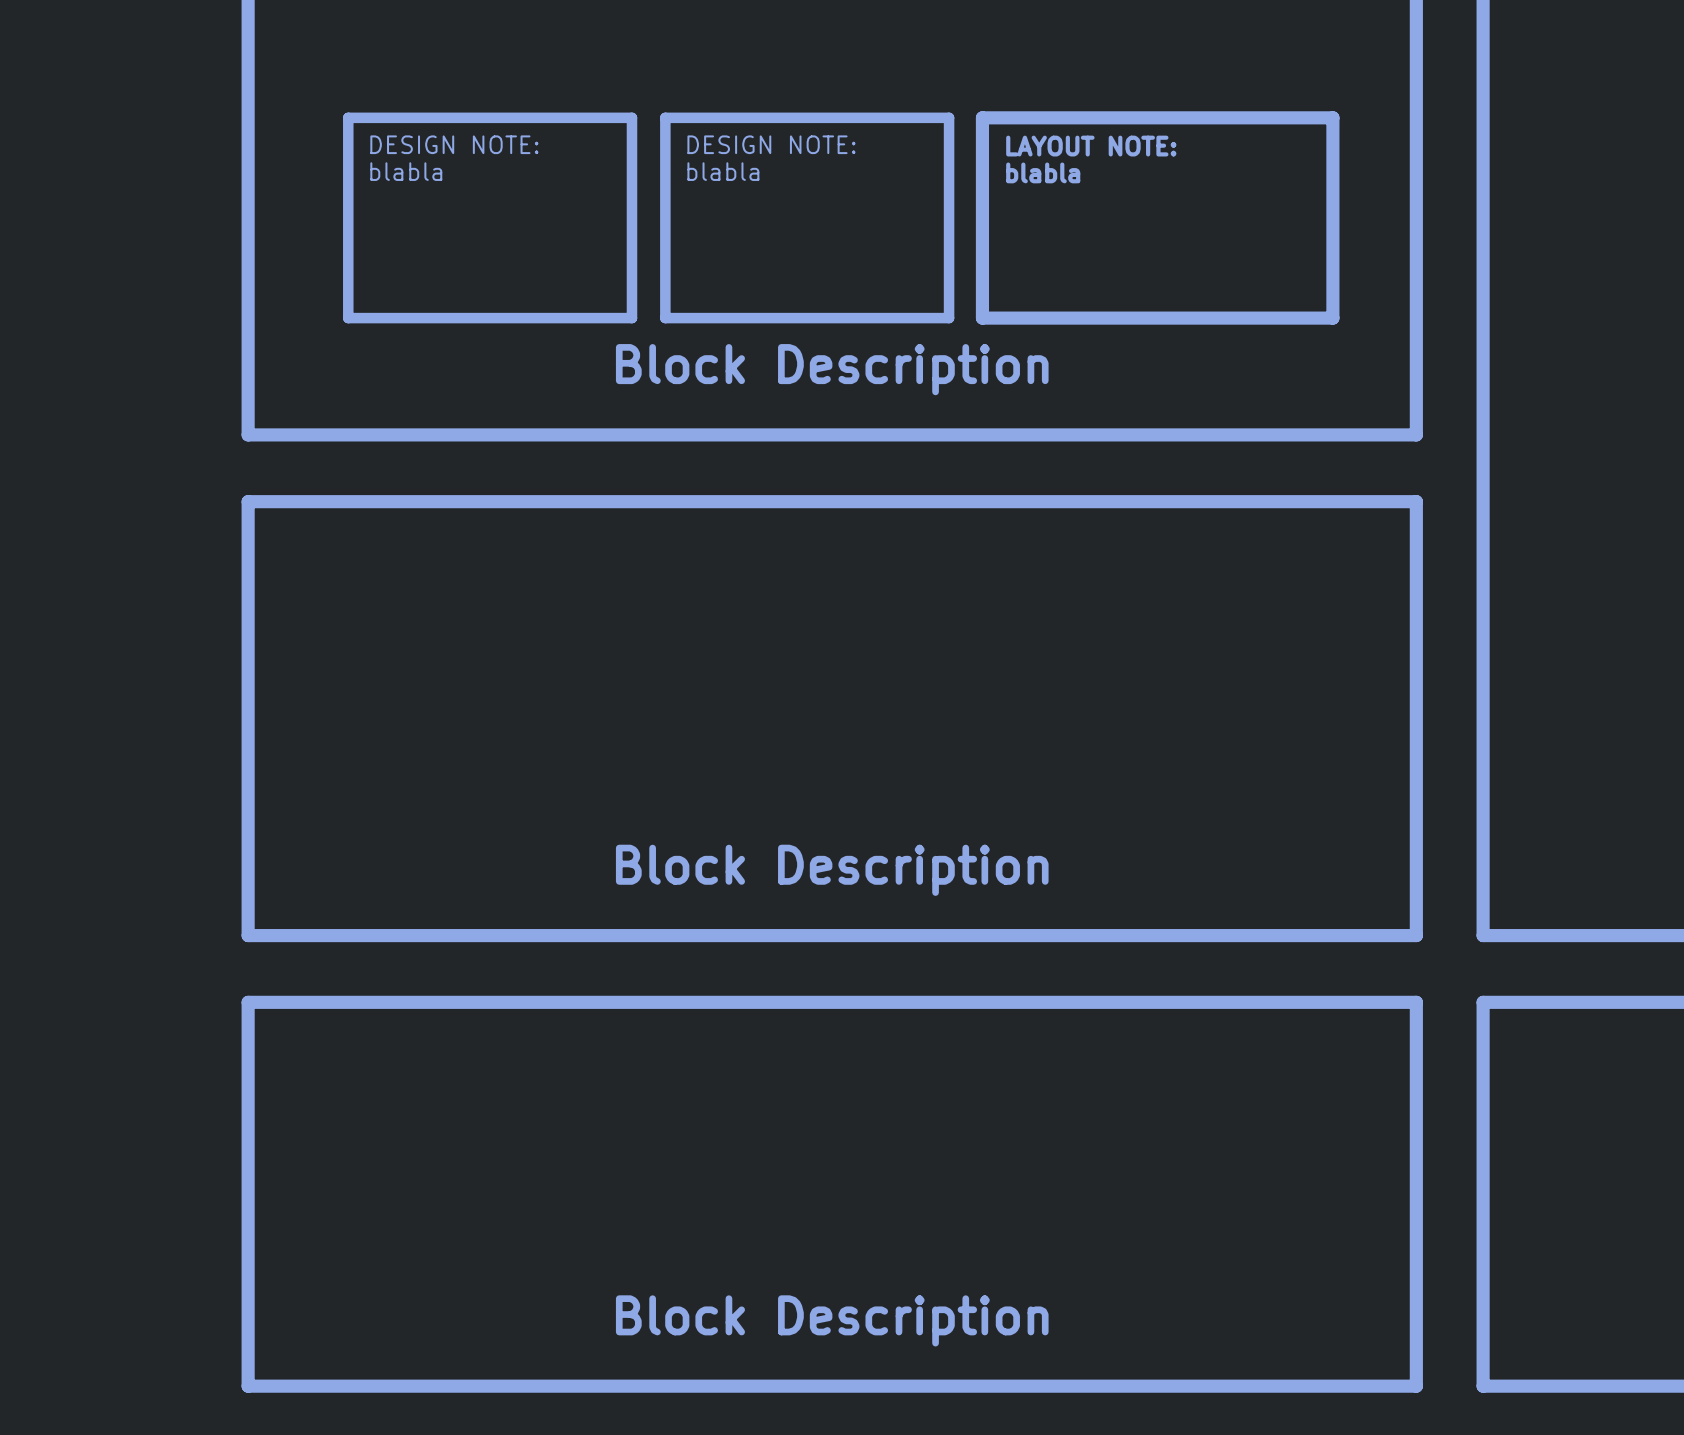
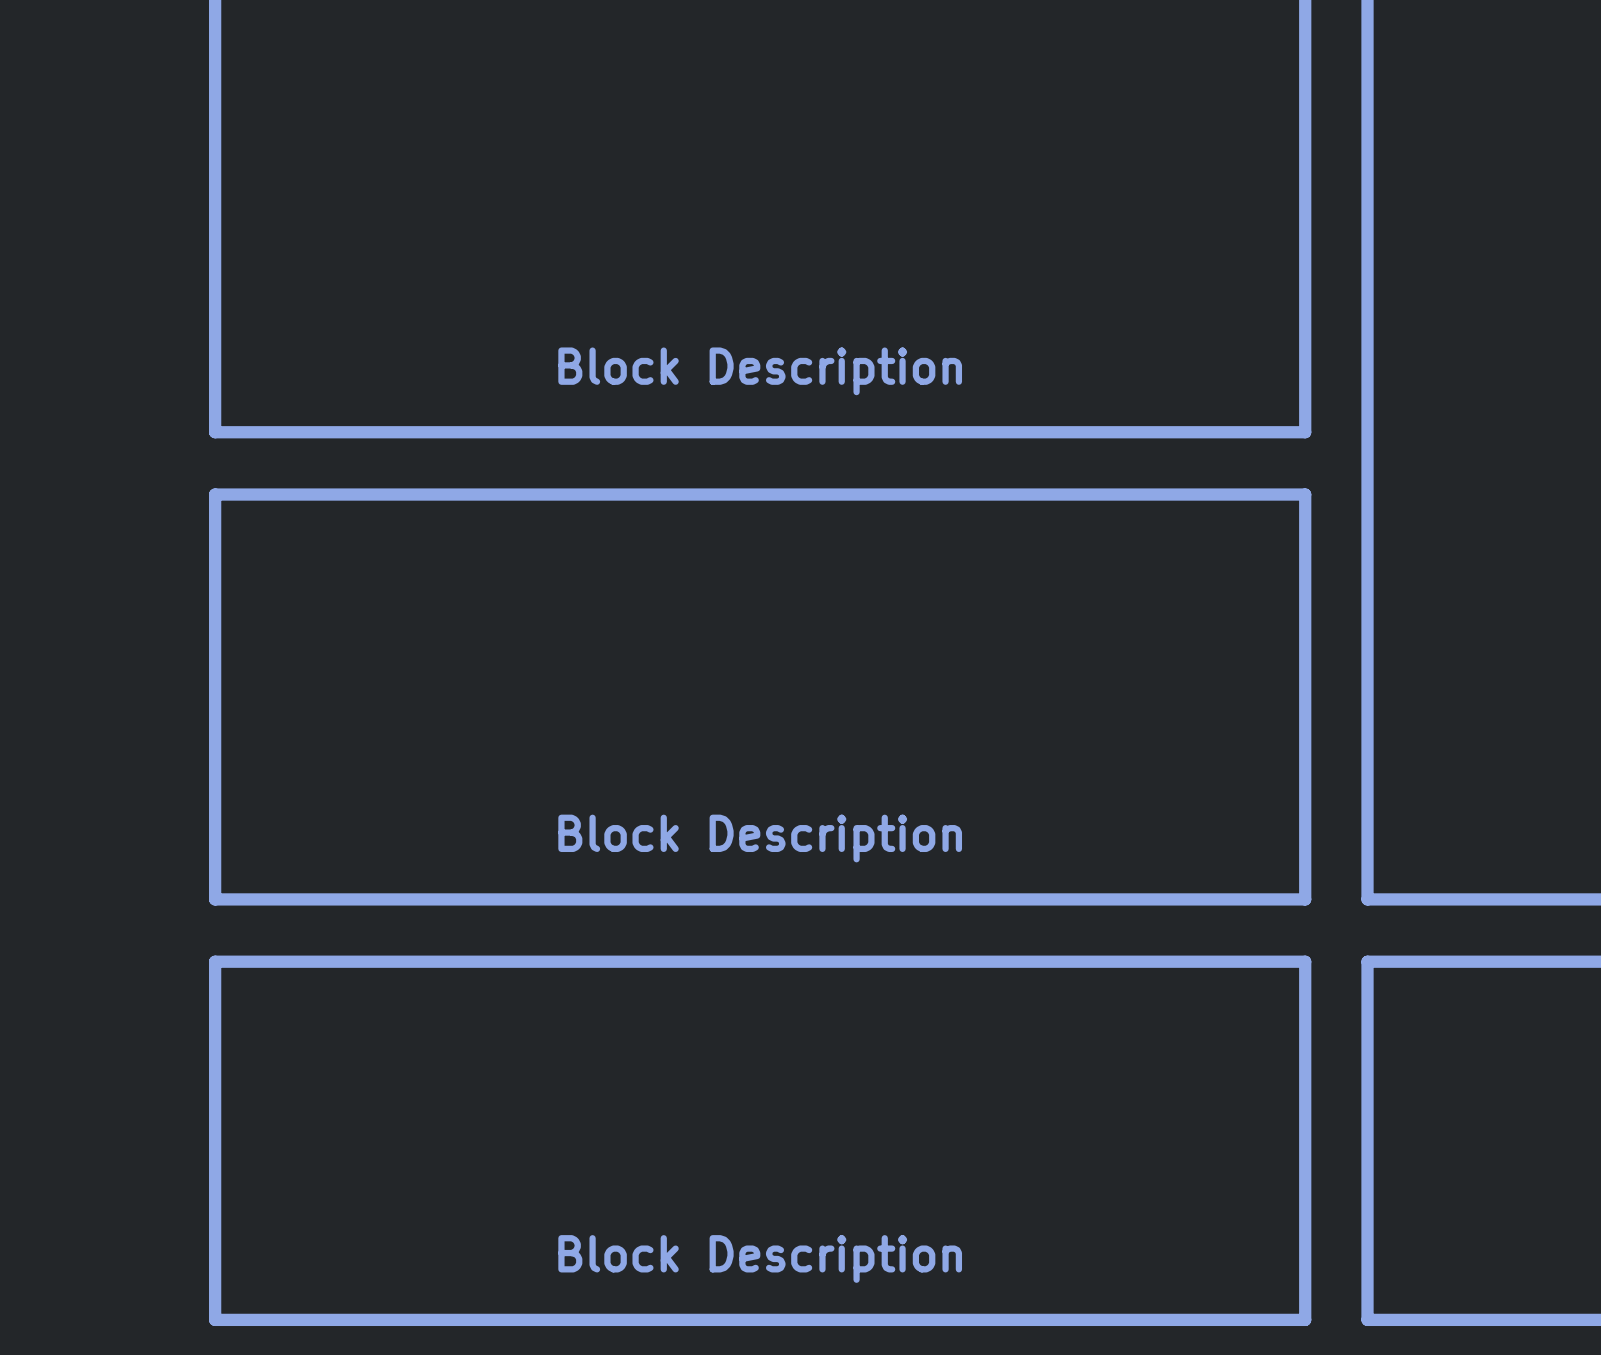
line: (348, 117) (631, 117) (631, 318) (348, 318) (348, 117) -> none
line: (665, 117) (949, 117) (949, 318) (665, 318) (665, 117) -> none
line: (982, 117) (1332, 117) (1332, 318) (982, 318) (982, 117) -> none
text: DESIGN NOTE: (454, 144) -> none
text: DESIGN NOTE: (771, 144) -> none
text: LAYOUT NOTE: (1091, 146) -> none
text: blabla (406, 171) -> none
text: blabla (723, 171) -> none
text: blabla (1043, 172) -> none

